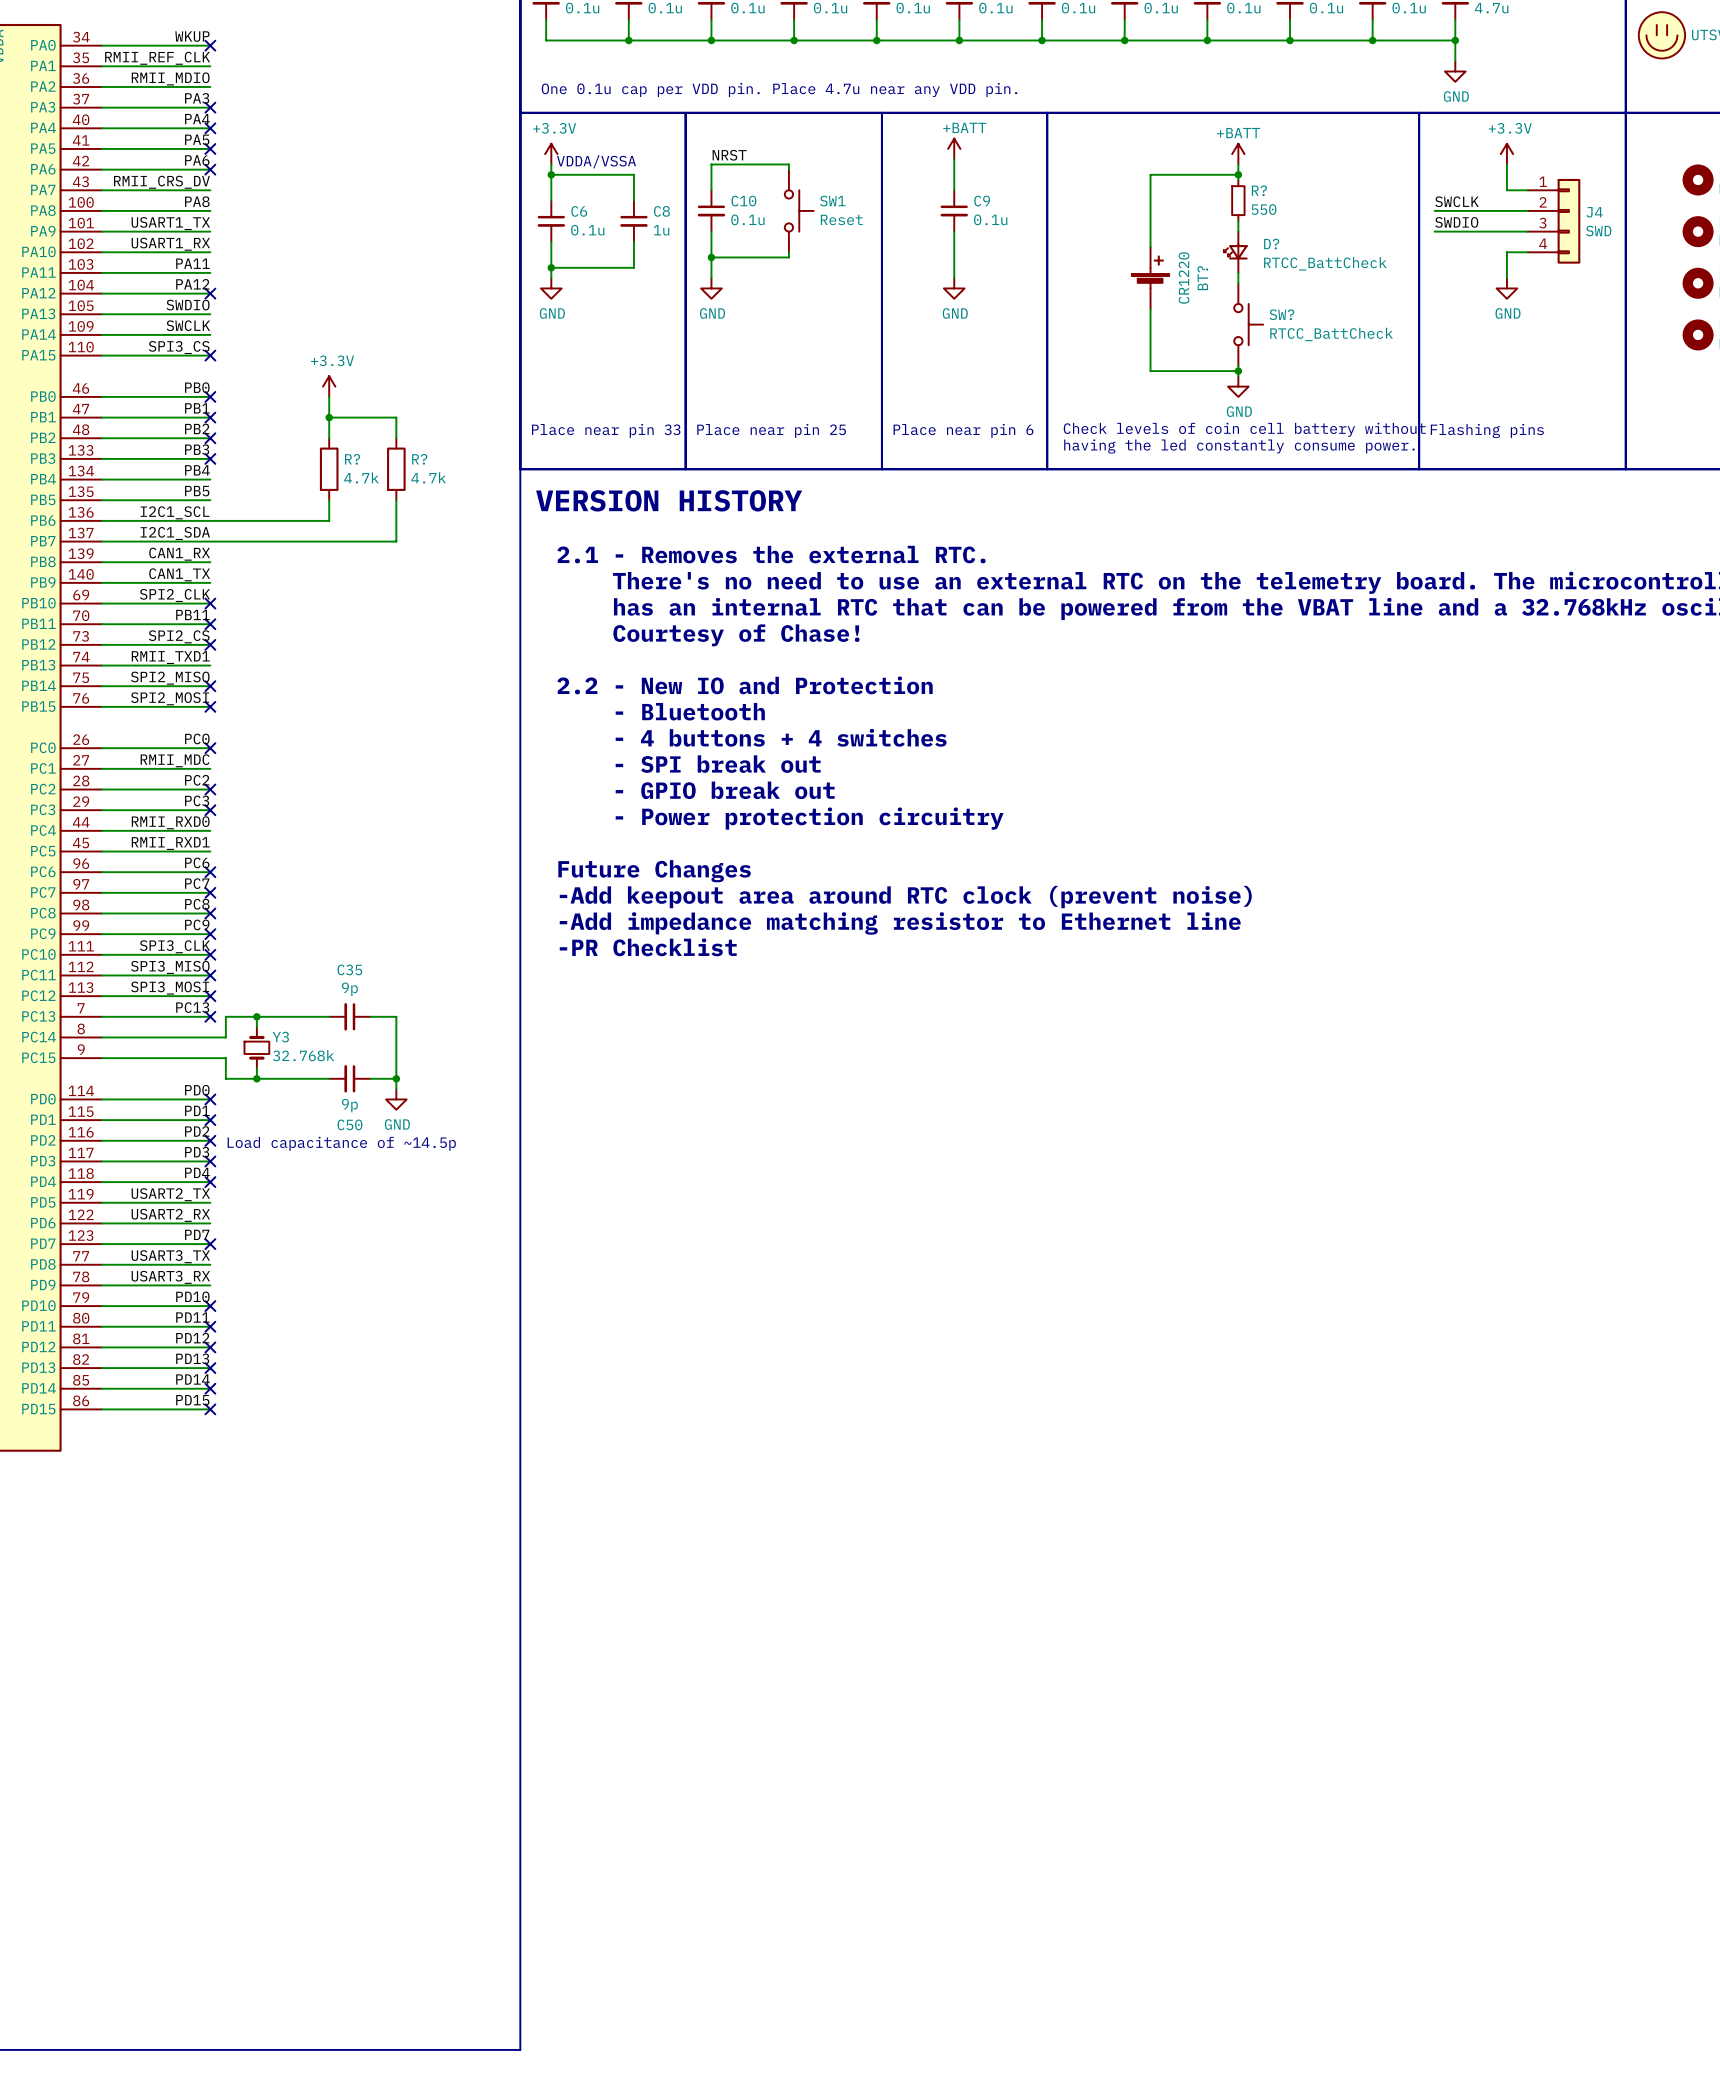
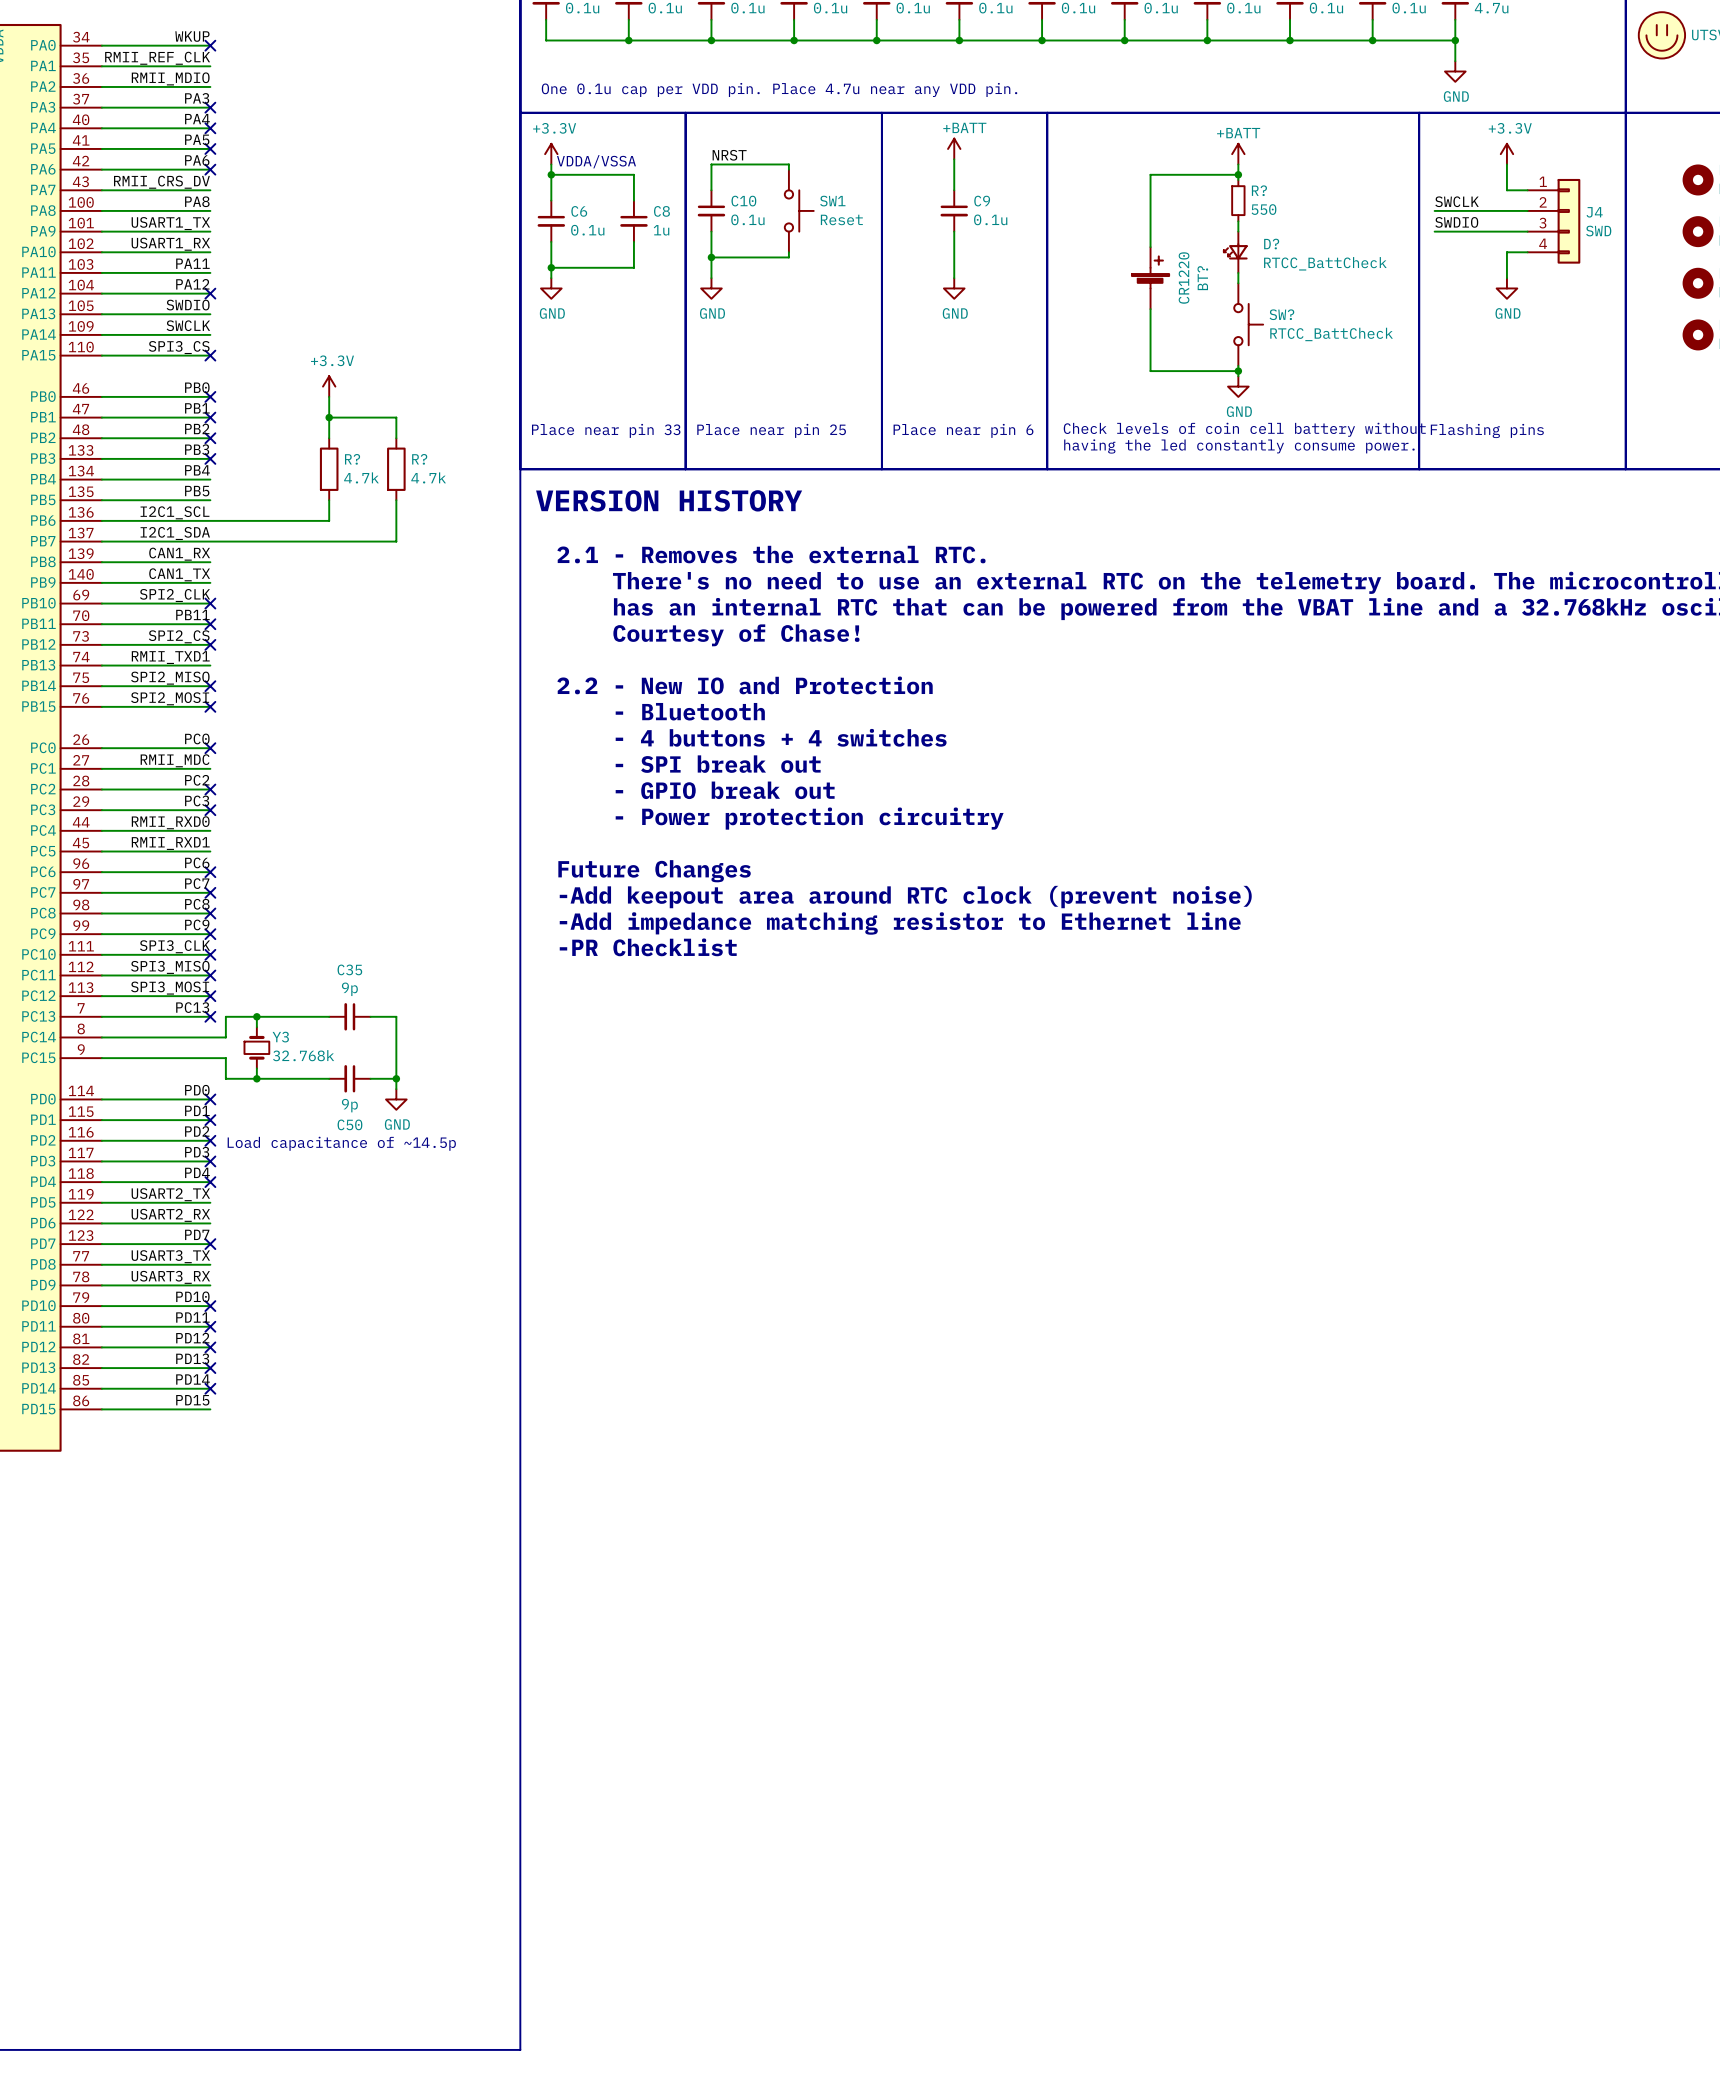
no-connect mark: (210, 1409) -> none

